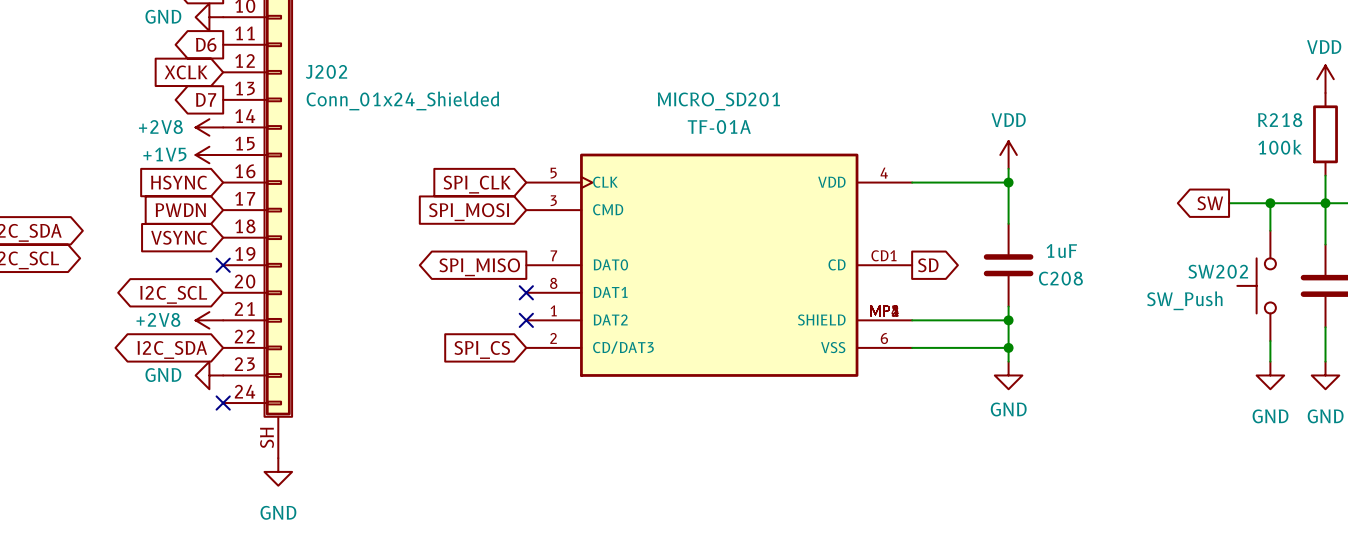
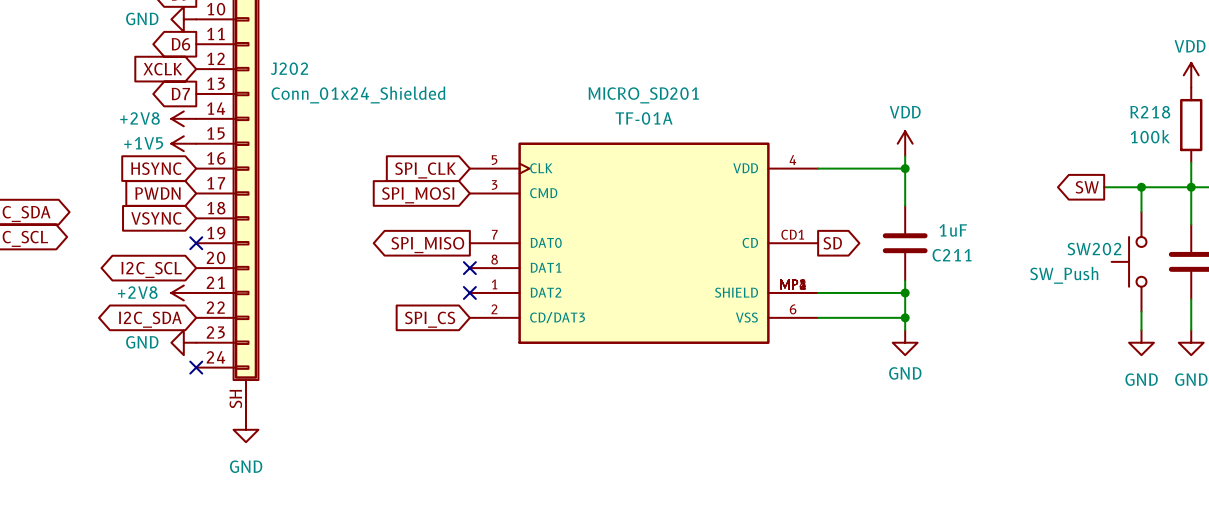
C208 name: C208 (1060, 278) -> C211 (952, 255)

